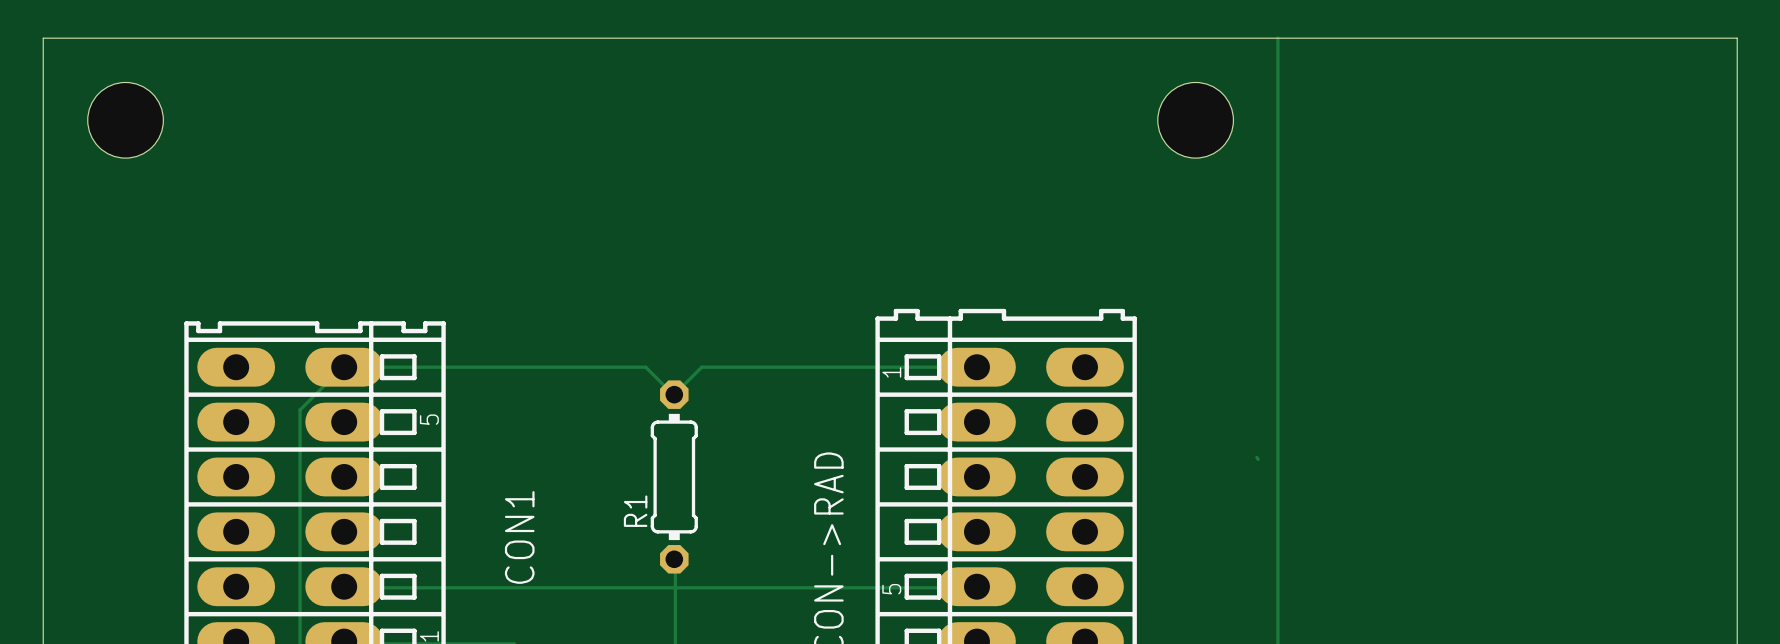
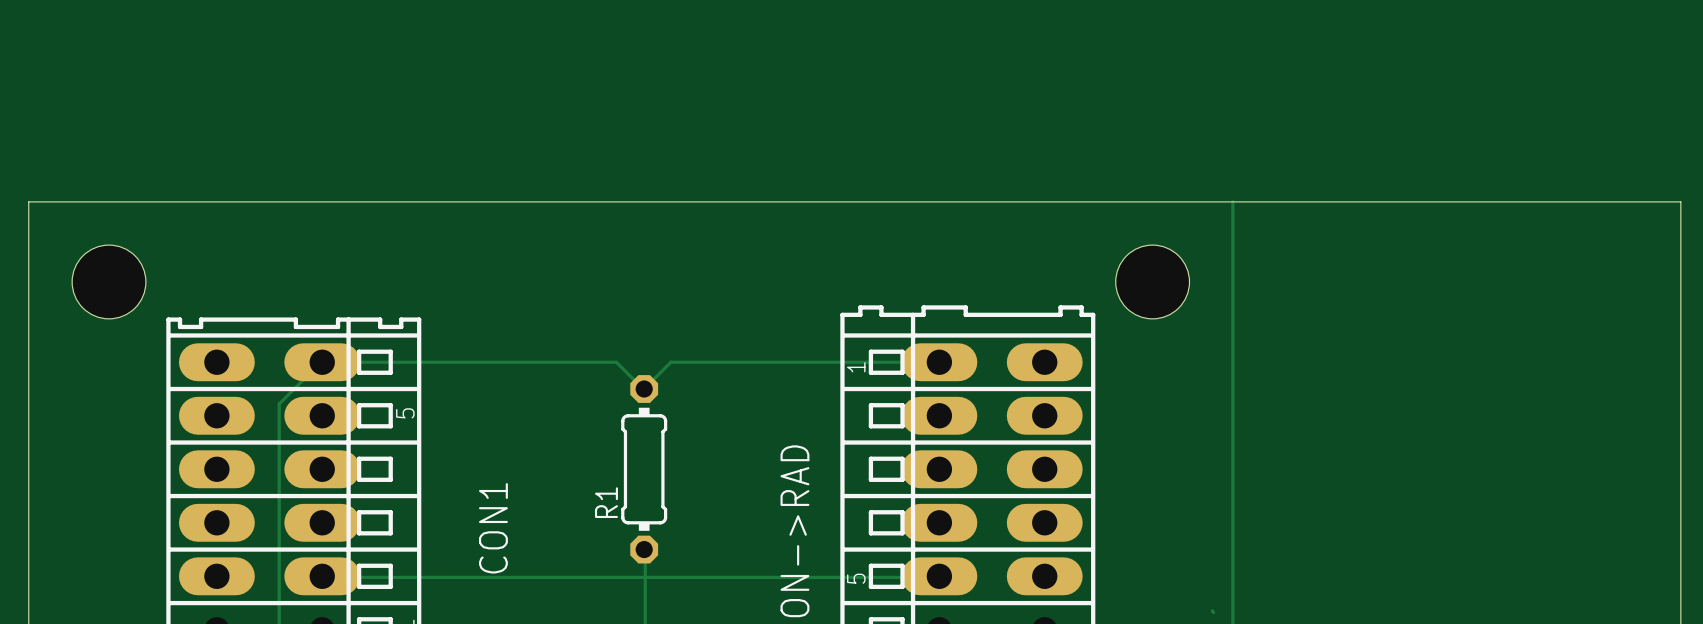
track: (1277, 37) (1277, 202) -> none
hole position: (125, 120) -> (109, 281)
hole position: (1195, 120) -> (1152, 281)
board edge: (43, 202) (43, 38) (1737, 38) (1737, 202) -> (28, 201) (1680, 201)
track: (1256, 457) (1258, 459) -> (1212, 610) (1213, 612)

